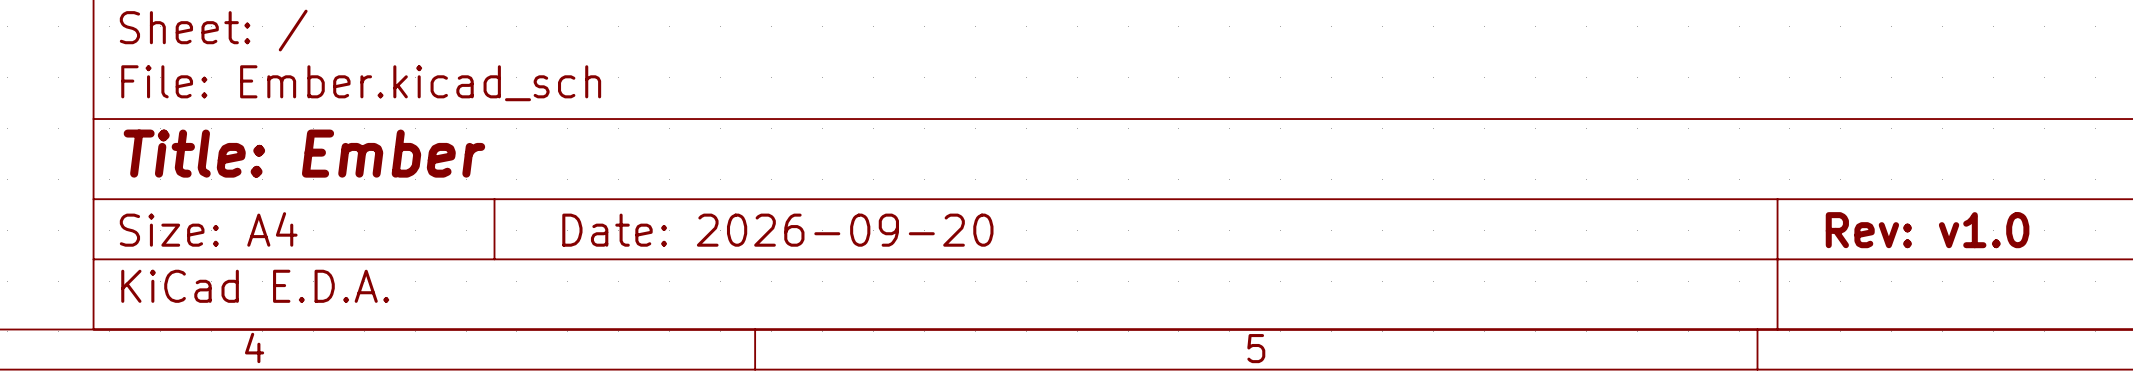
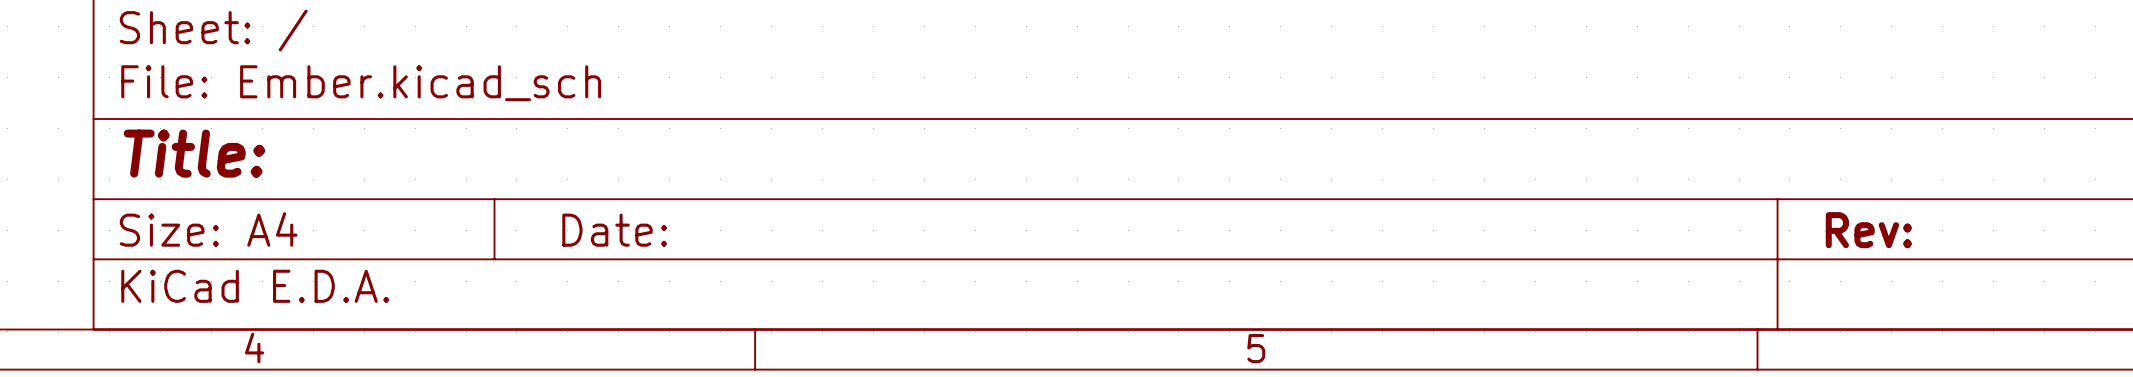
title block: Title: Ember (304, 153) -> Title: (194, 153)
title block: Date: 2026-09-20 (777, 230) -> Date: (614, 230)
title block: Rev: v1.0 (1927, 230) -> Rev: (1868, 230)

